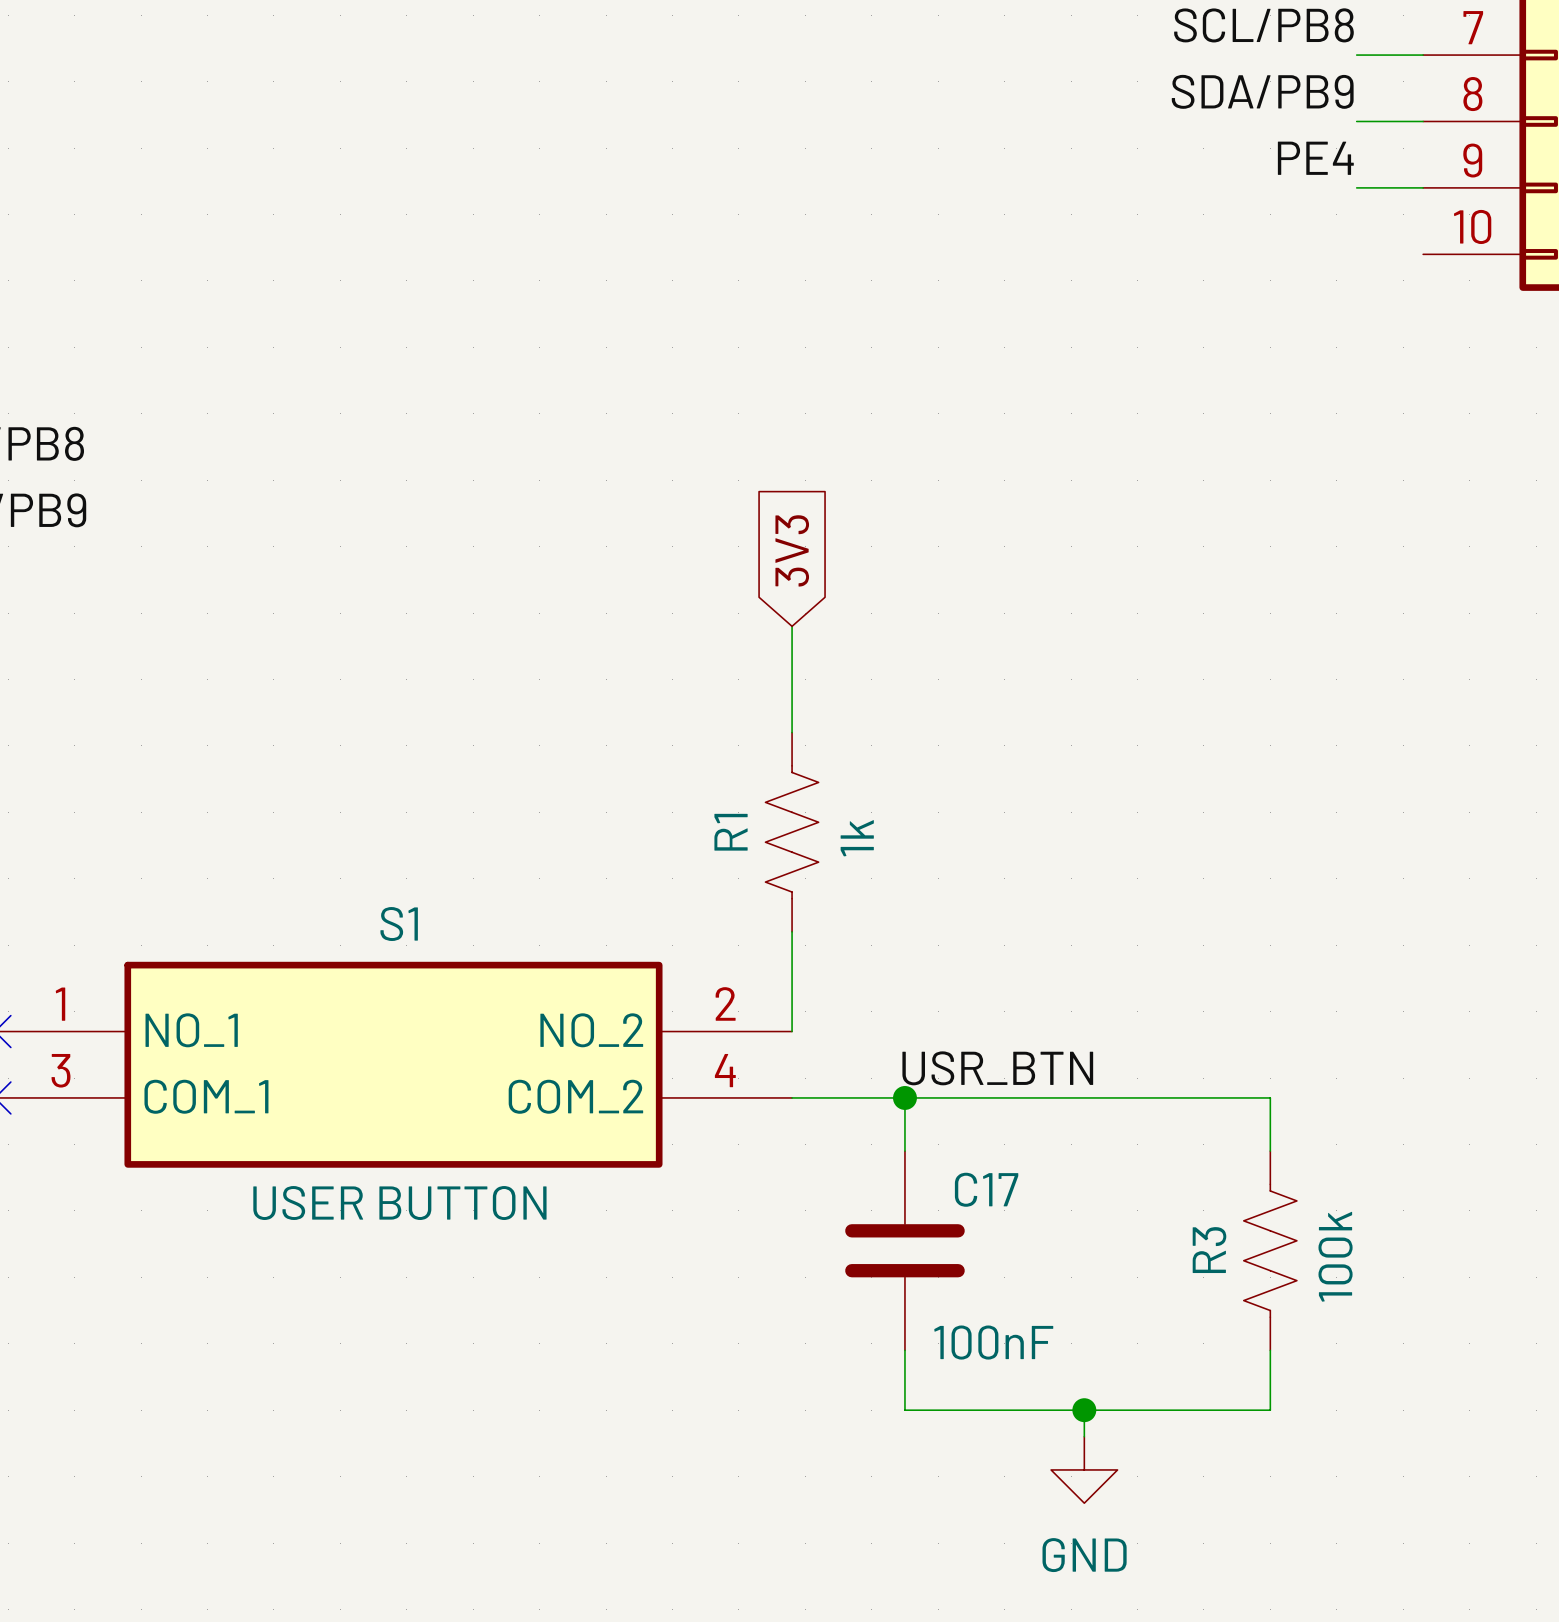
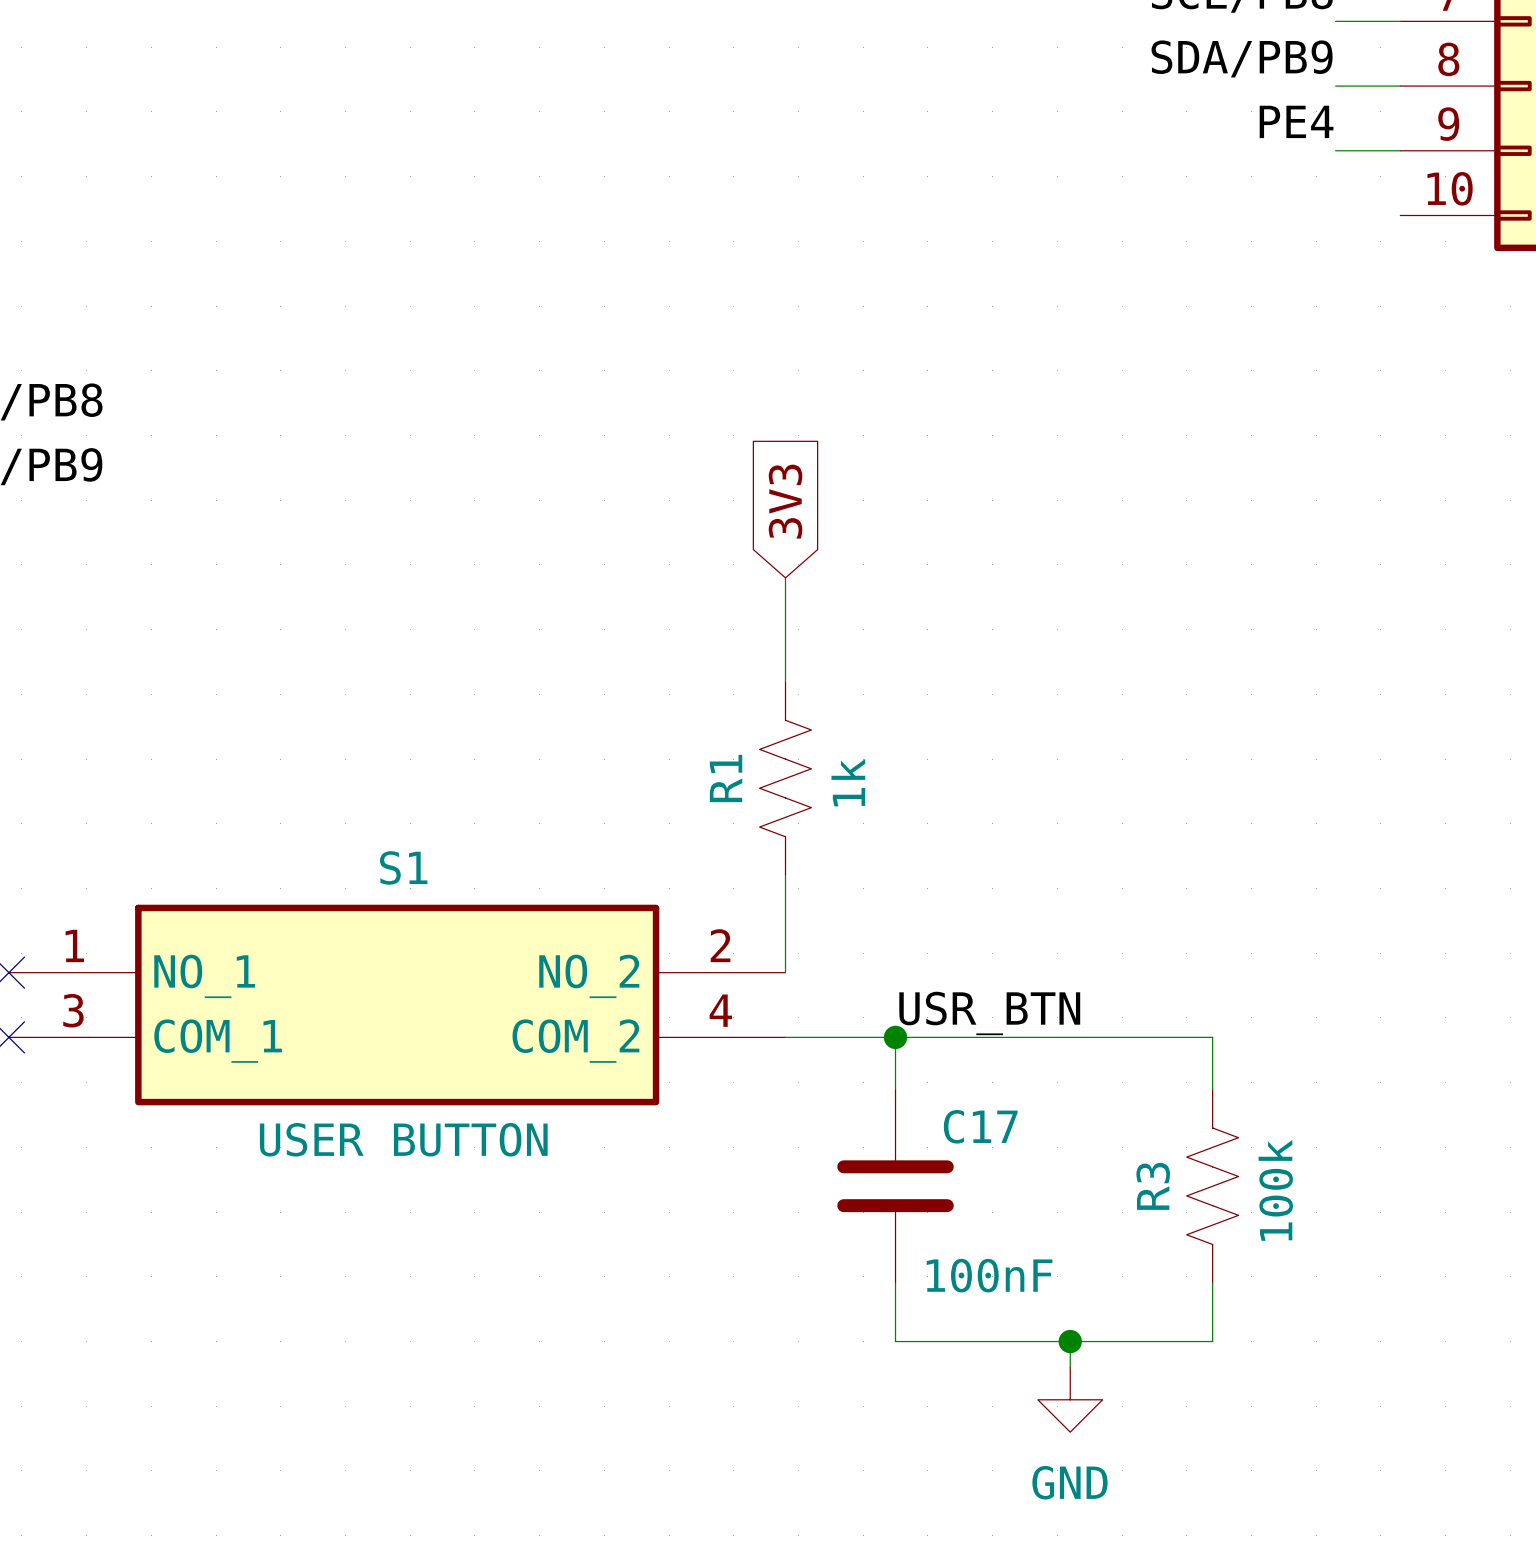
wire: (1230, 1097) (1270, 1097) (1270, 1151) -> (1212, 1037) (1212, 1089)
R3 position: (1270, 1250) -> (1212, 1186)
wire: (1270, 1350) (1270, 1410) (1230, 1410) -> (1212, 1283) (1212, 1341)

